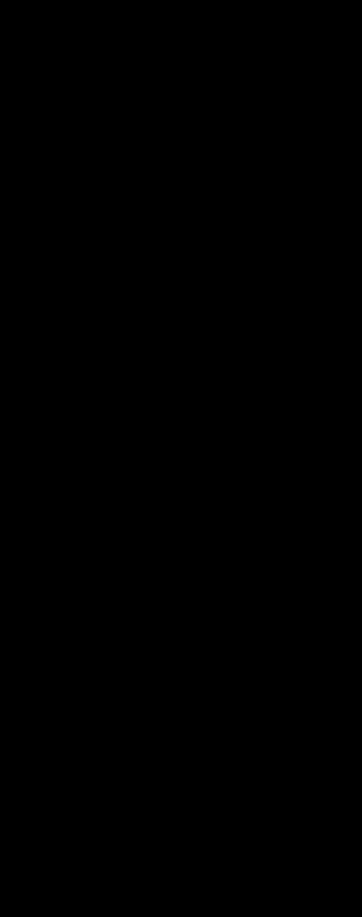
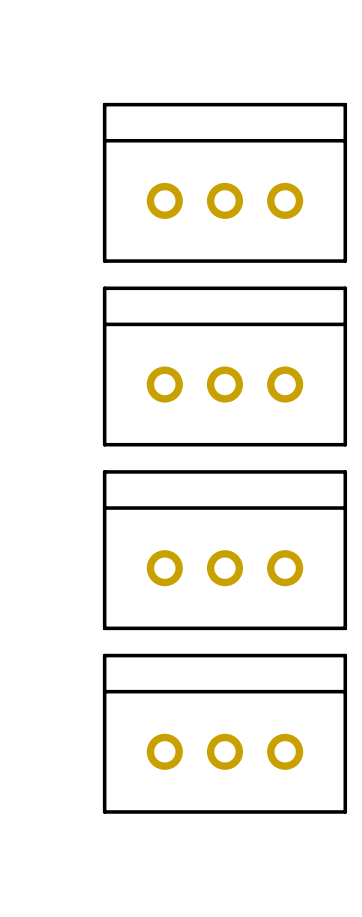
part: none -> (224, 182)
part: none -> (224, 366)
part: none -> (224, 550)
part: none -> (224, 733)

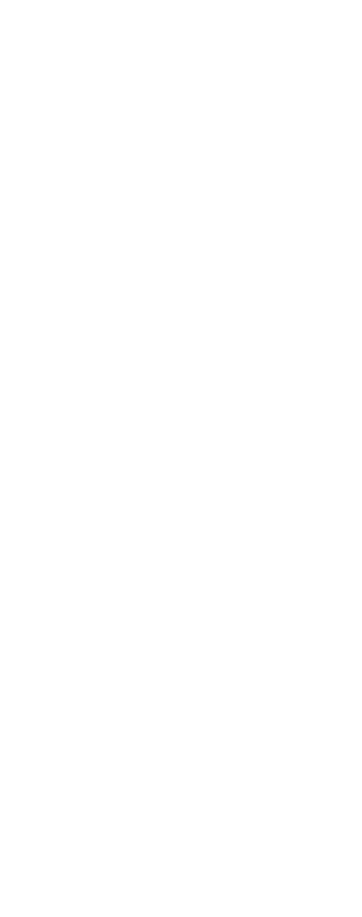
part: (224, 182) -> none
part: (224, 366) -> none
part: (224, 550) -> none
part: (224, 733) -> none

